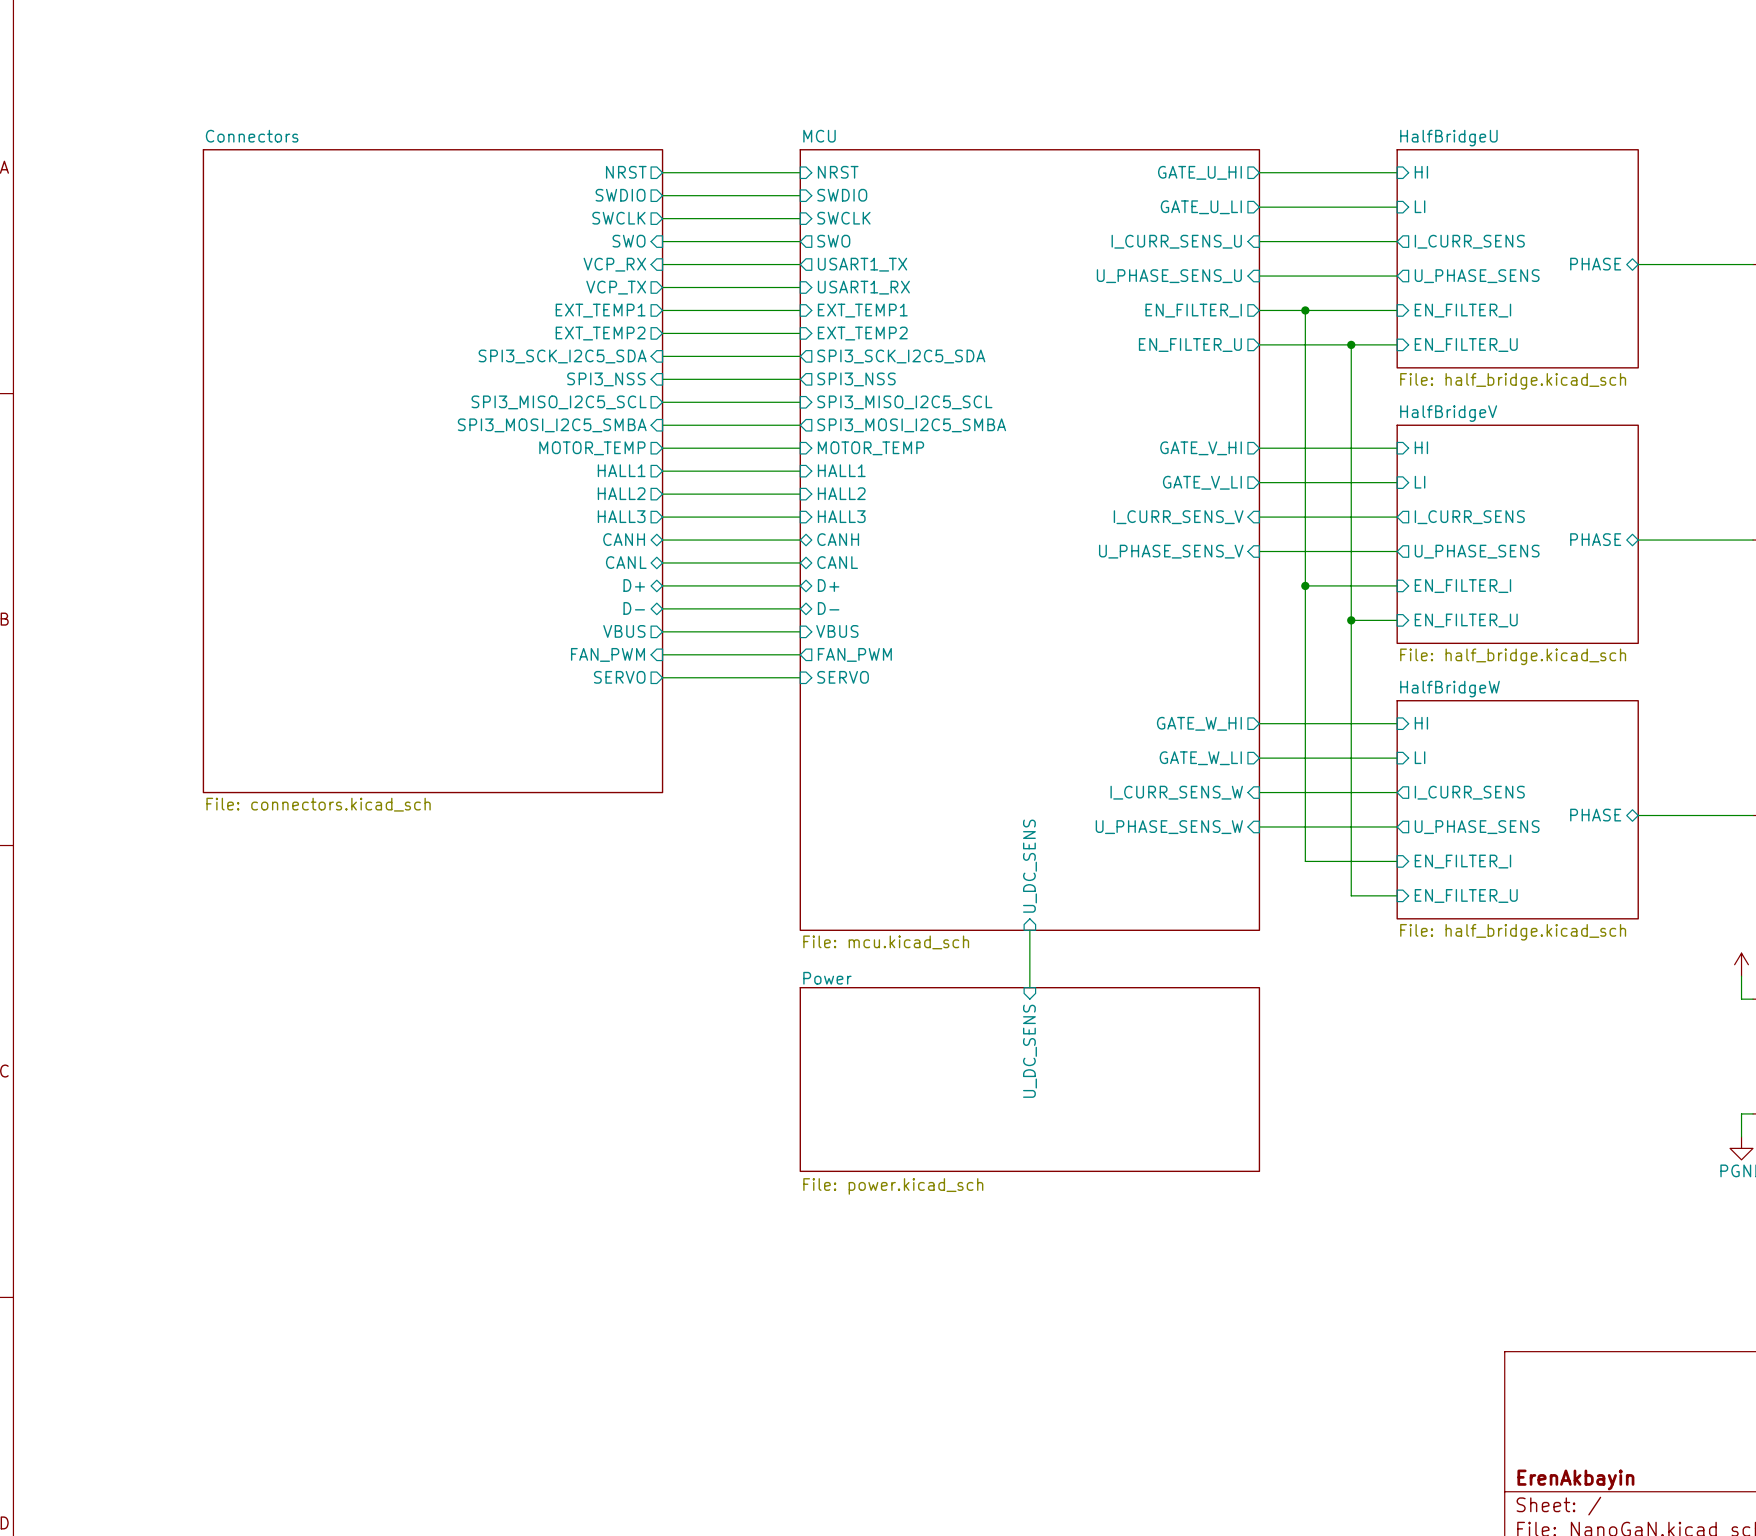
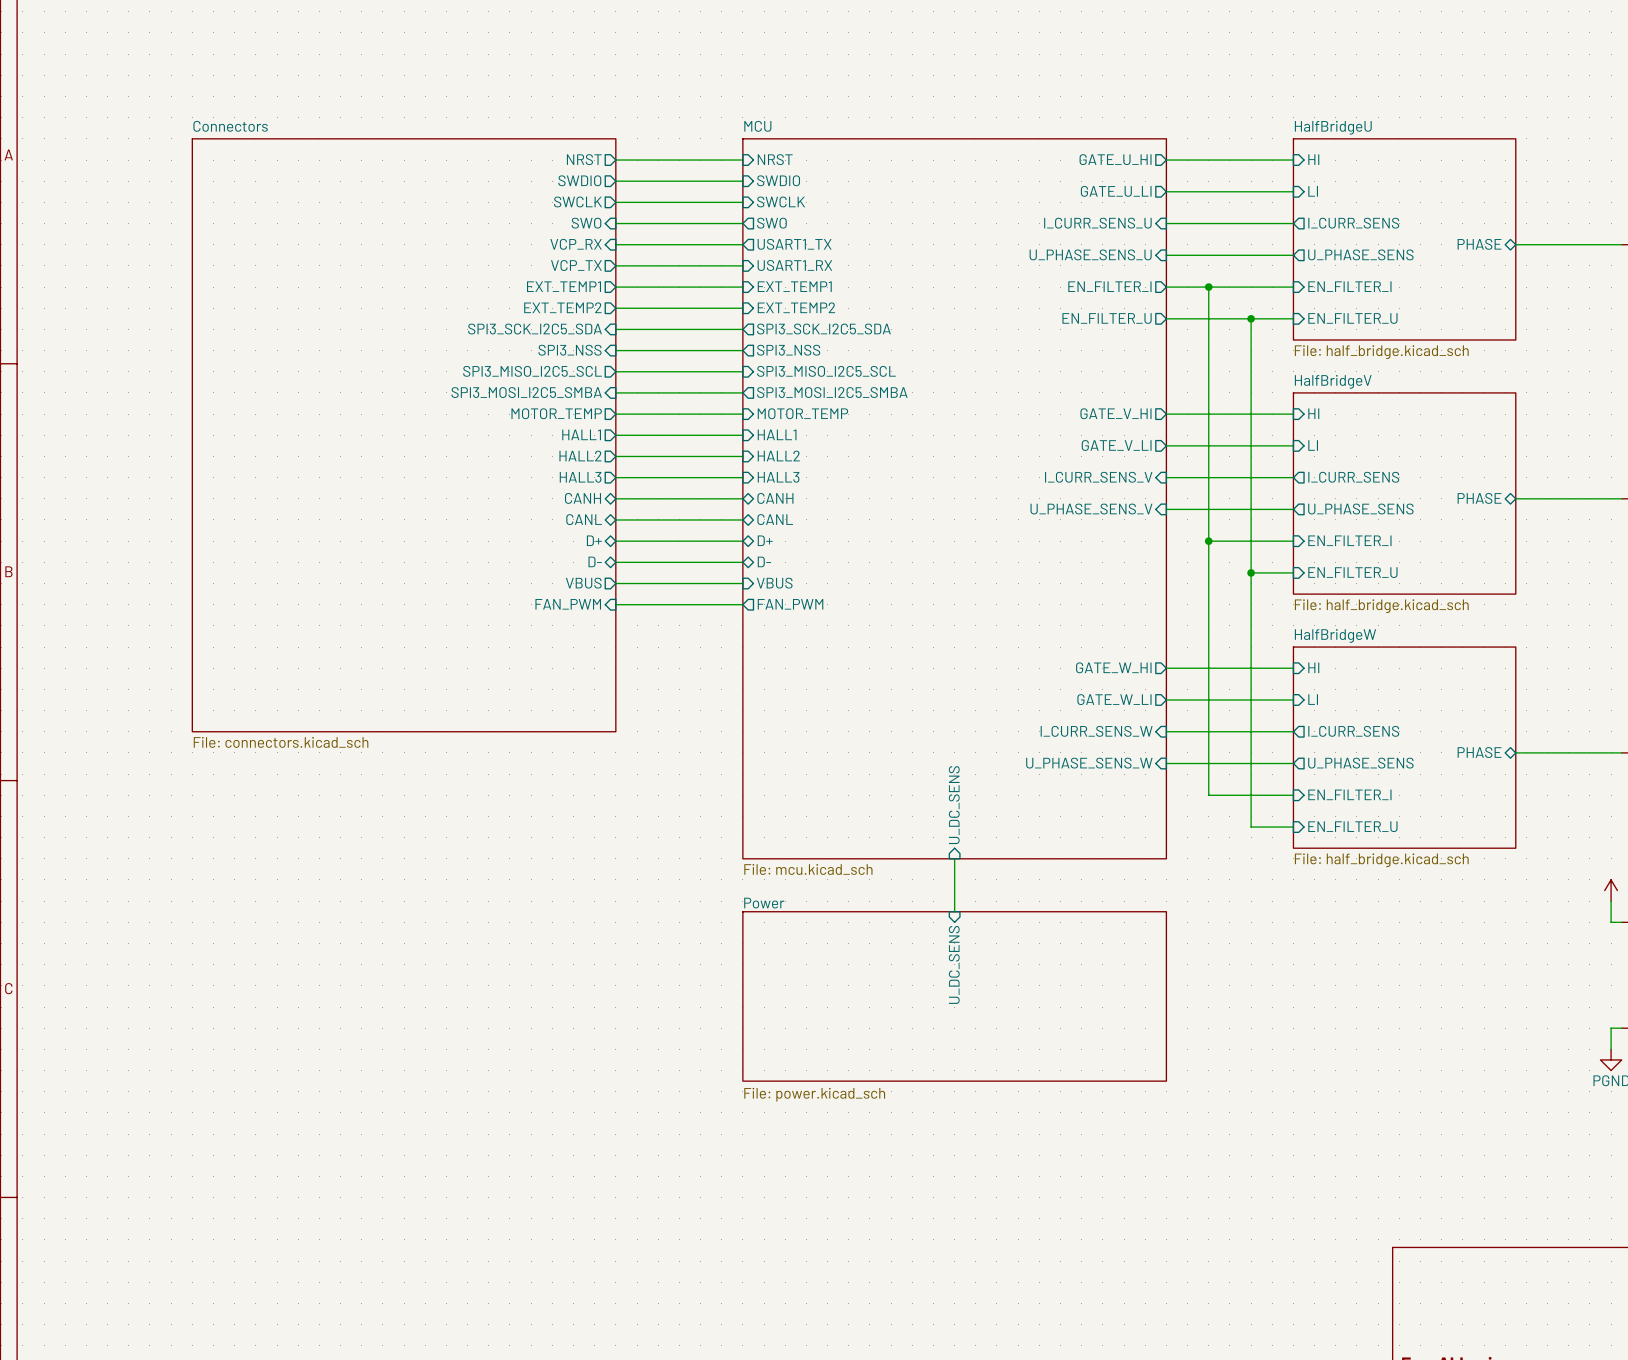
sheet pin: SERVO (619, 677) -> none
wire: (662, 677) (800, 677) -> none
sheet pin: SERVO (843, 677) -> none

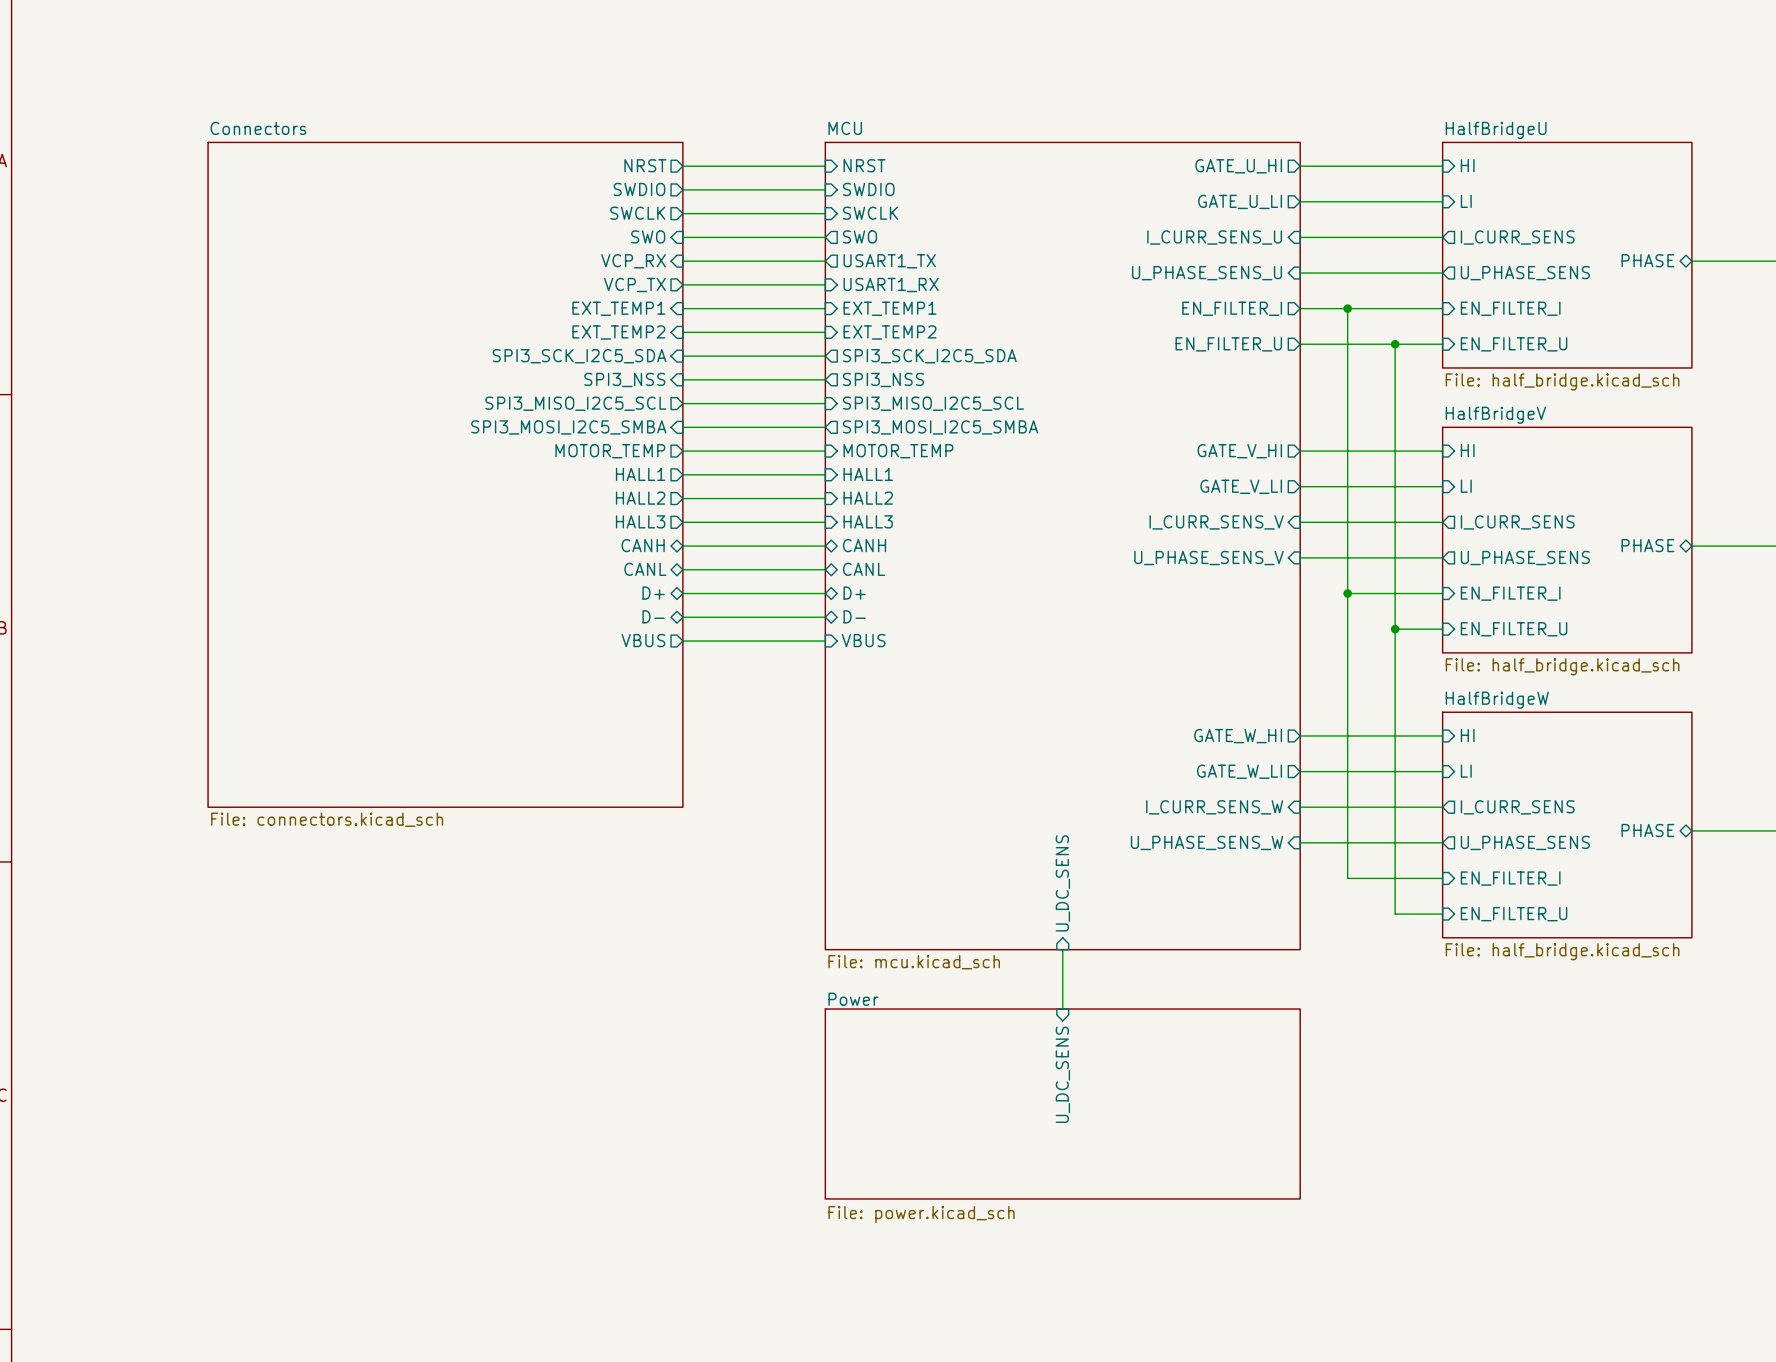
sheet pin shape: output (563, 286) -> input (618, 308)
sheet pin shape: output (562, 307) -> input (618, 332)
sheet pin: FAN_PWM (568, 604) -> none
wire: (615, 604) (742, 604) -> none
sheet pin: FAN_PWM (790, 604) -> none

